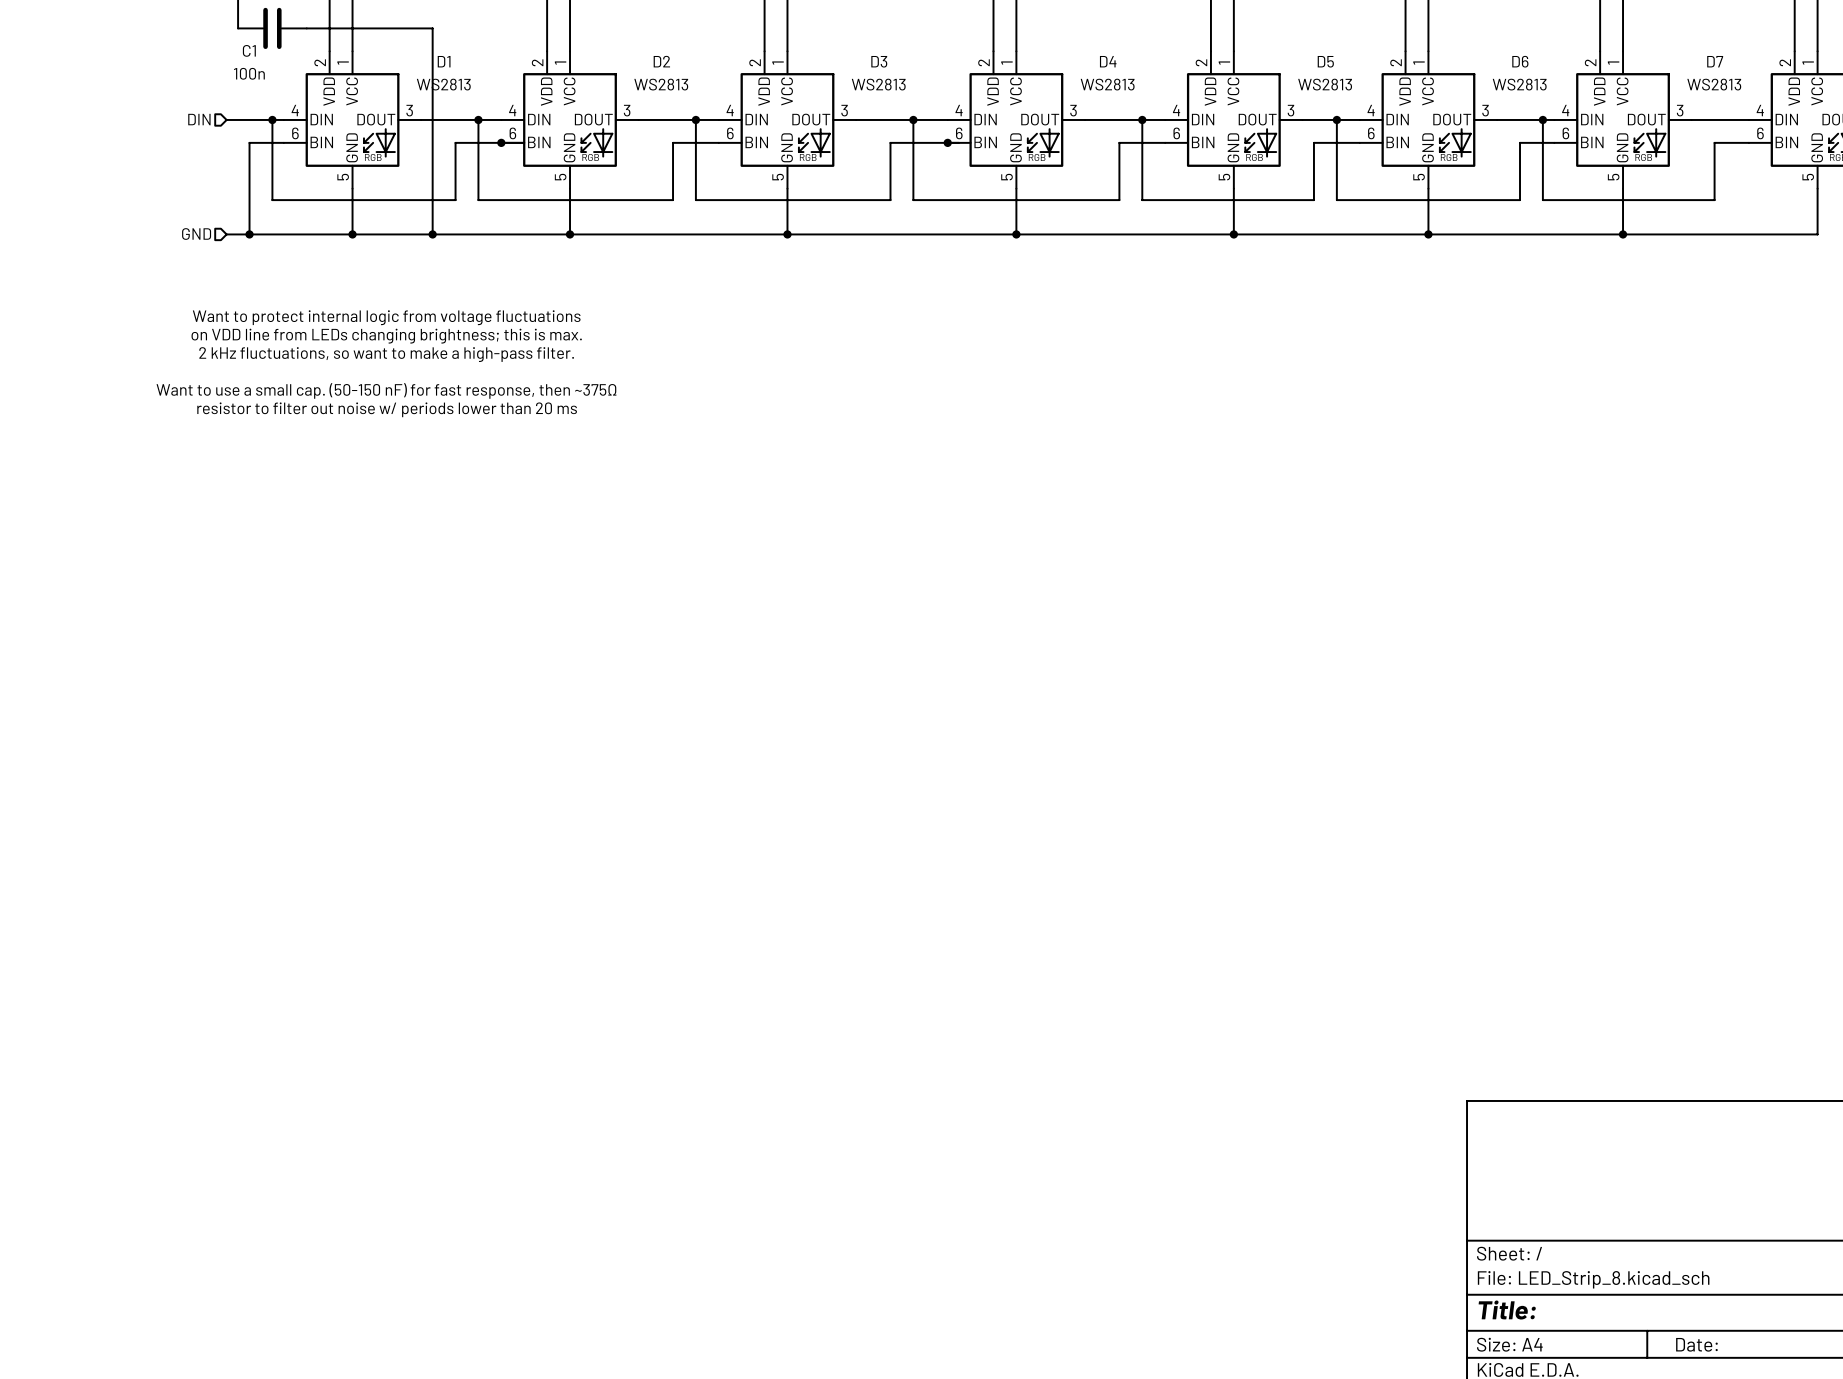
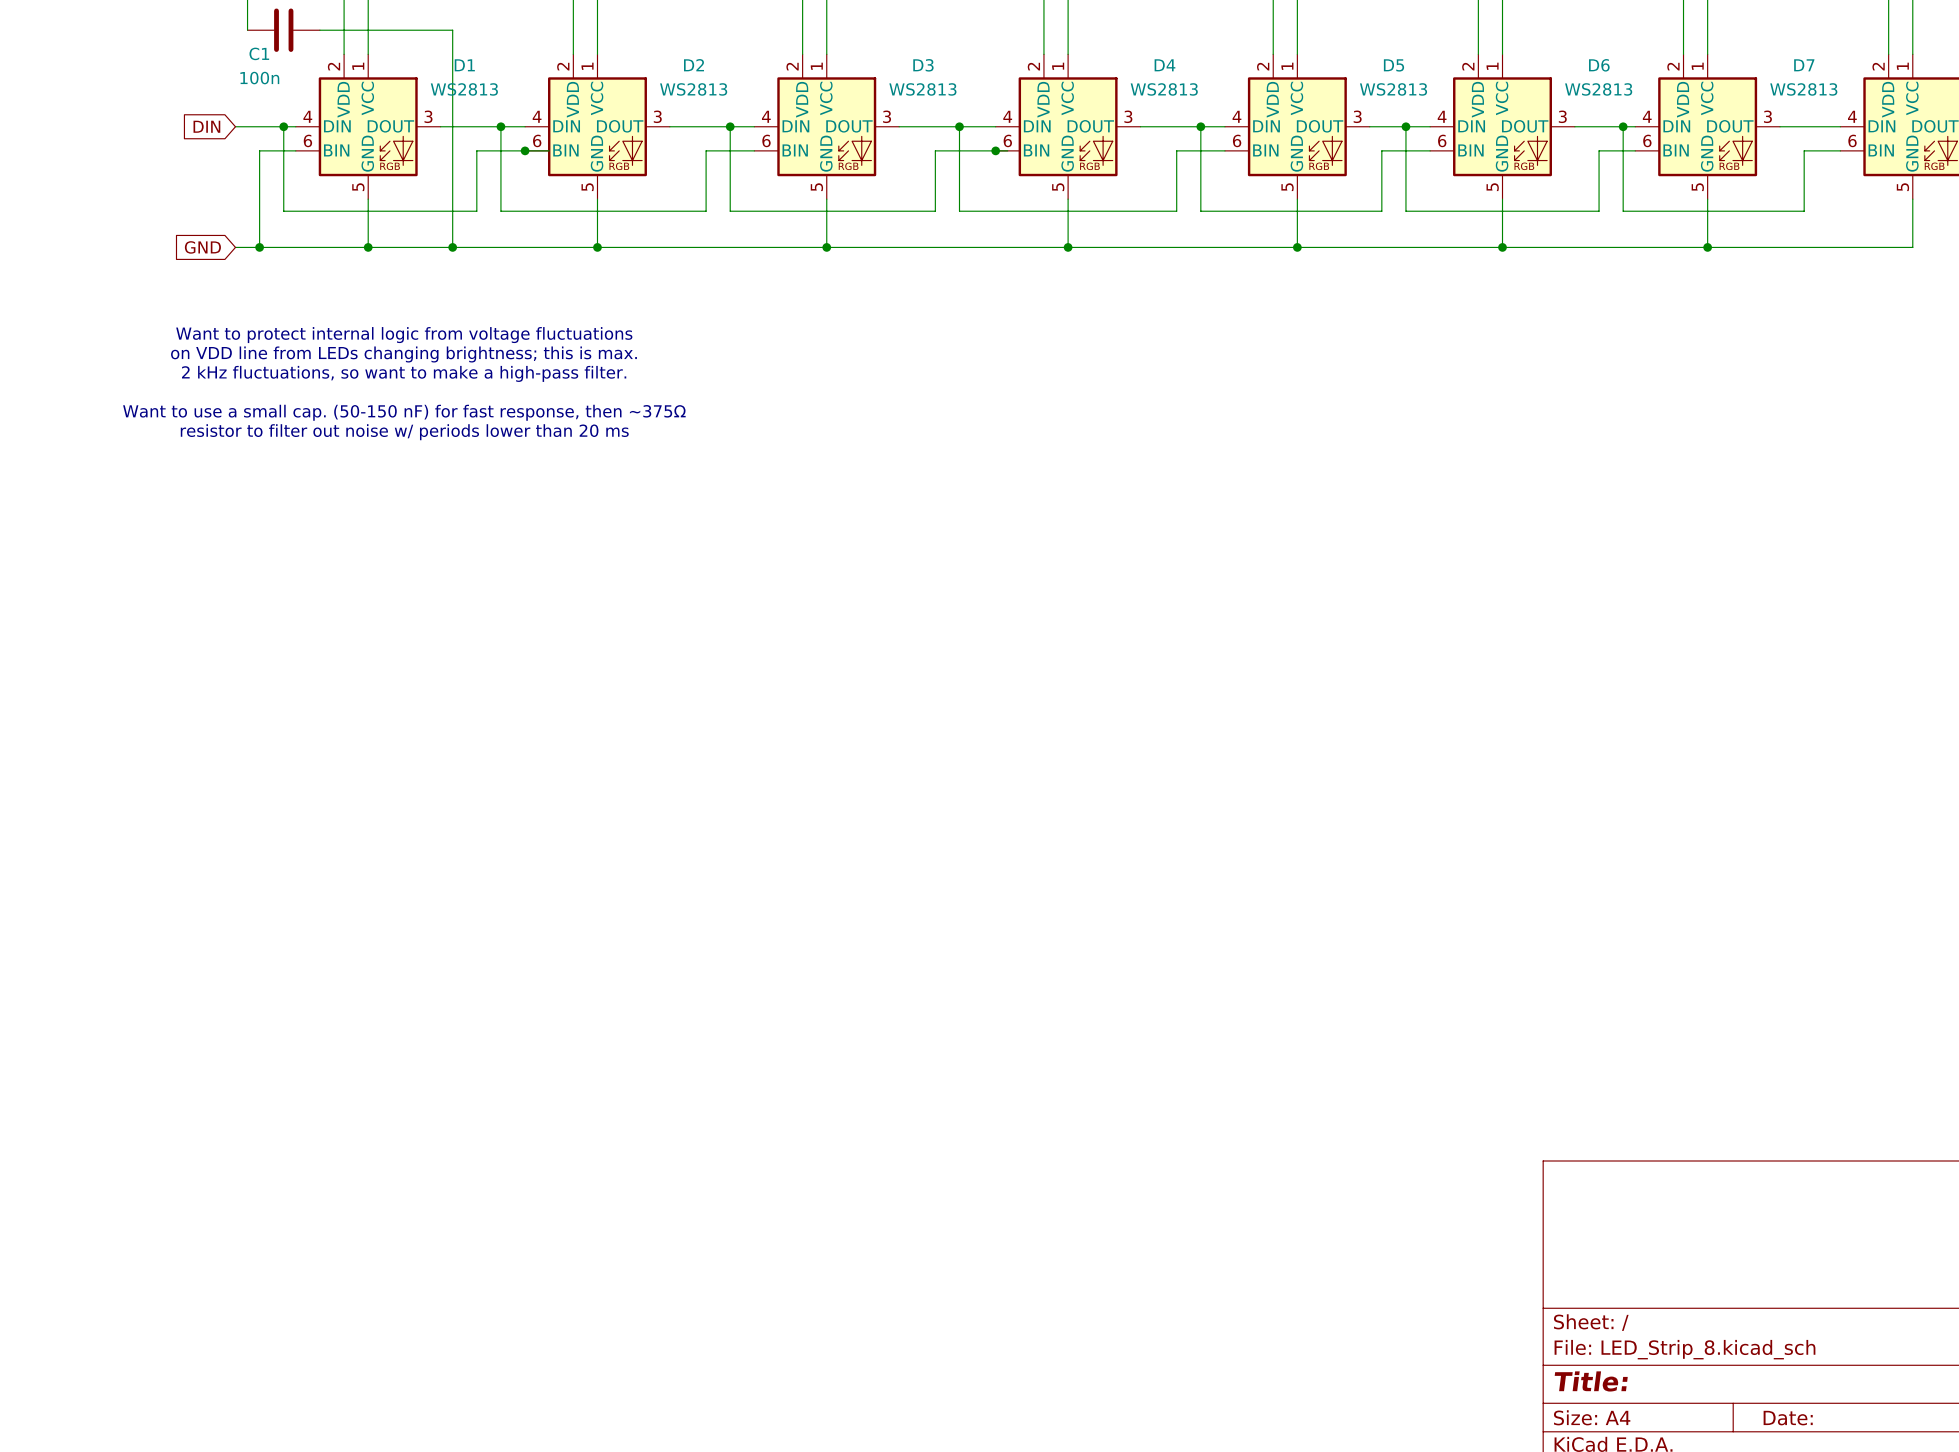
hierarchical label: DIN (199, 119) -> none
global label: none -> DIN (206, 126)
hierarchical label: GND (196, 234) -> none
global label: none -> GND (202, 247)

